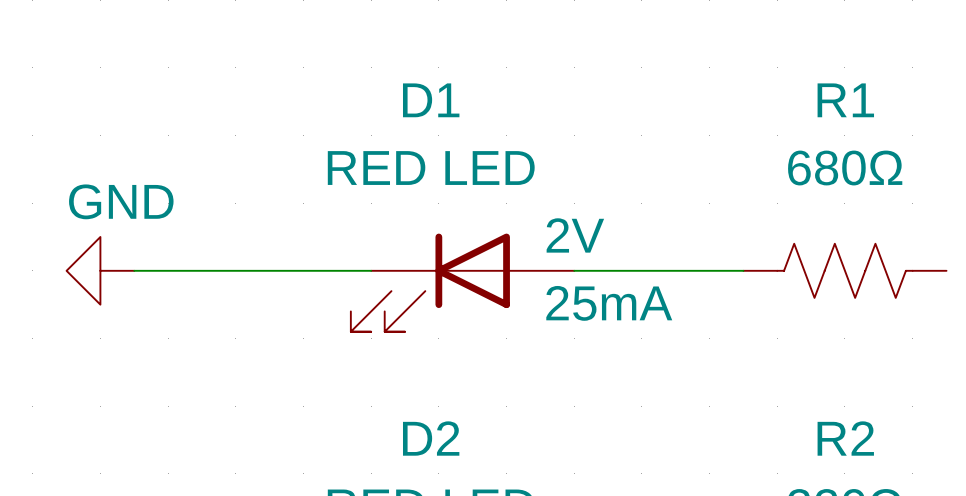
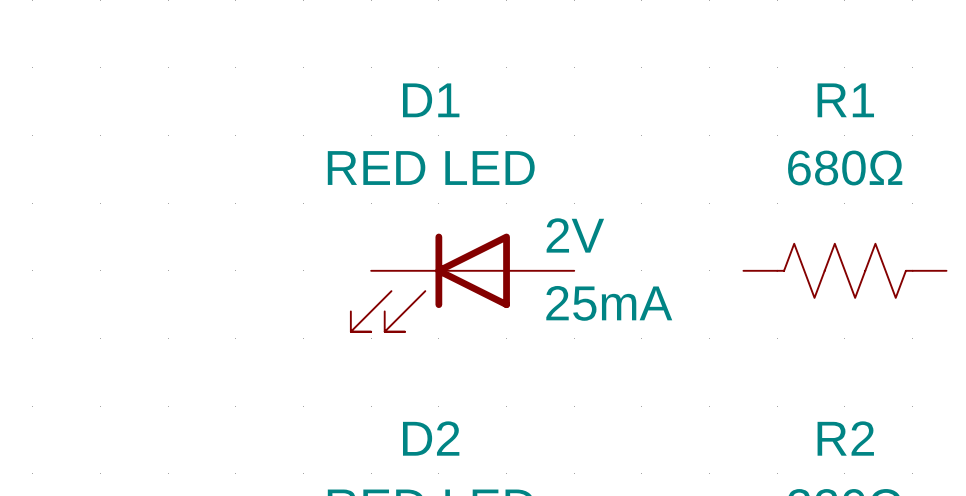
power symbol: GND (100, 270) -> none
wire: (134, 270) (371, 270) -> none
wire: (574, 270) (743, 270) -> none

